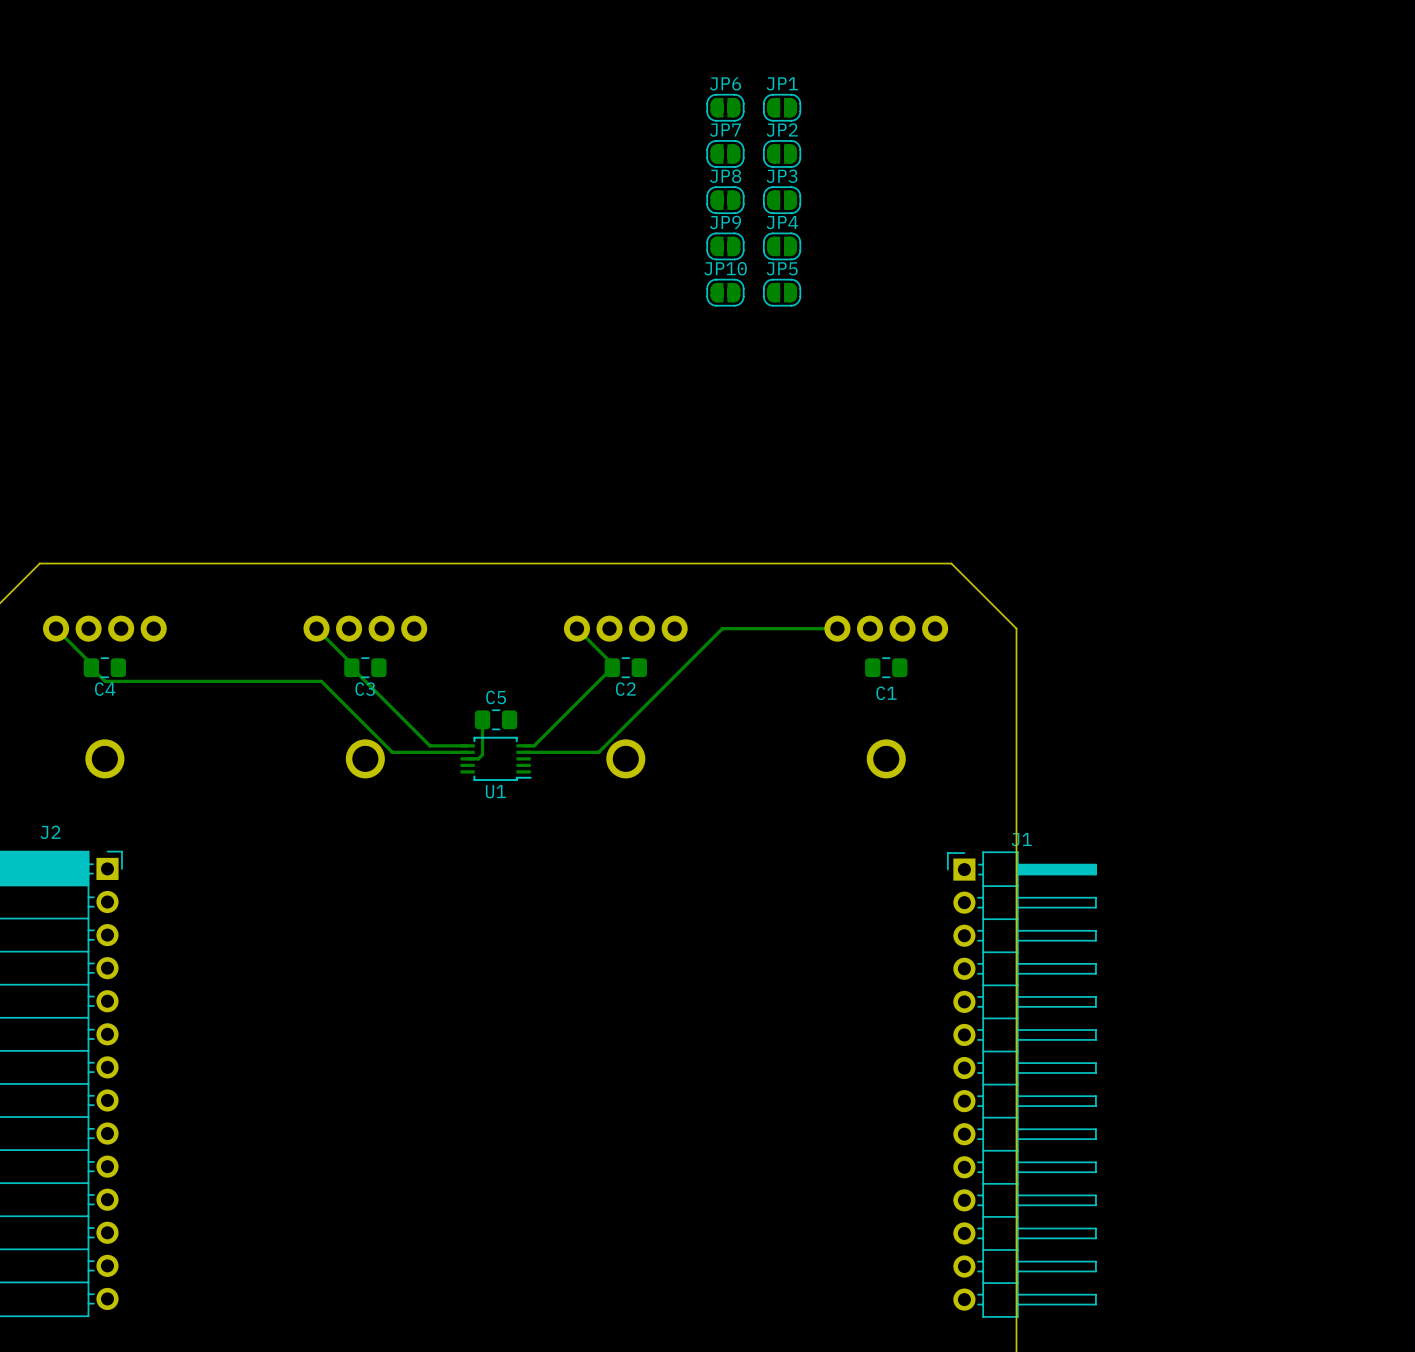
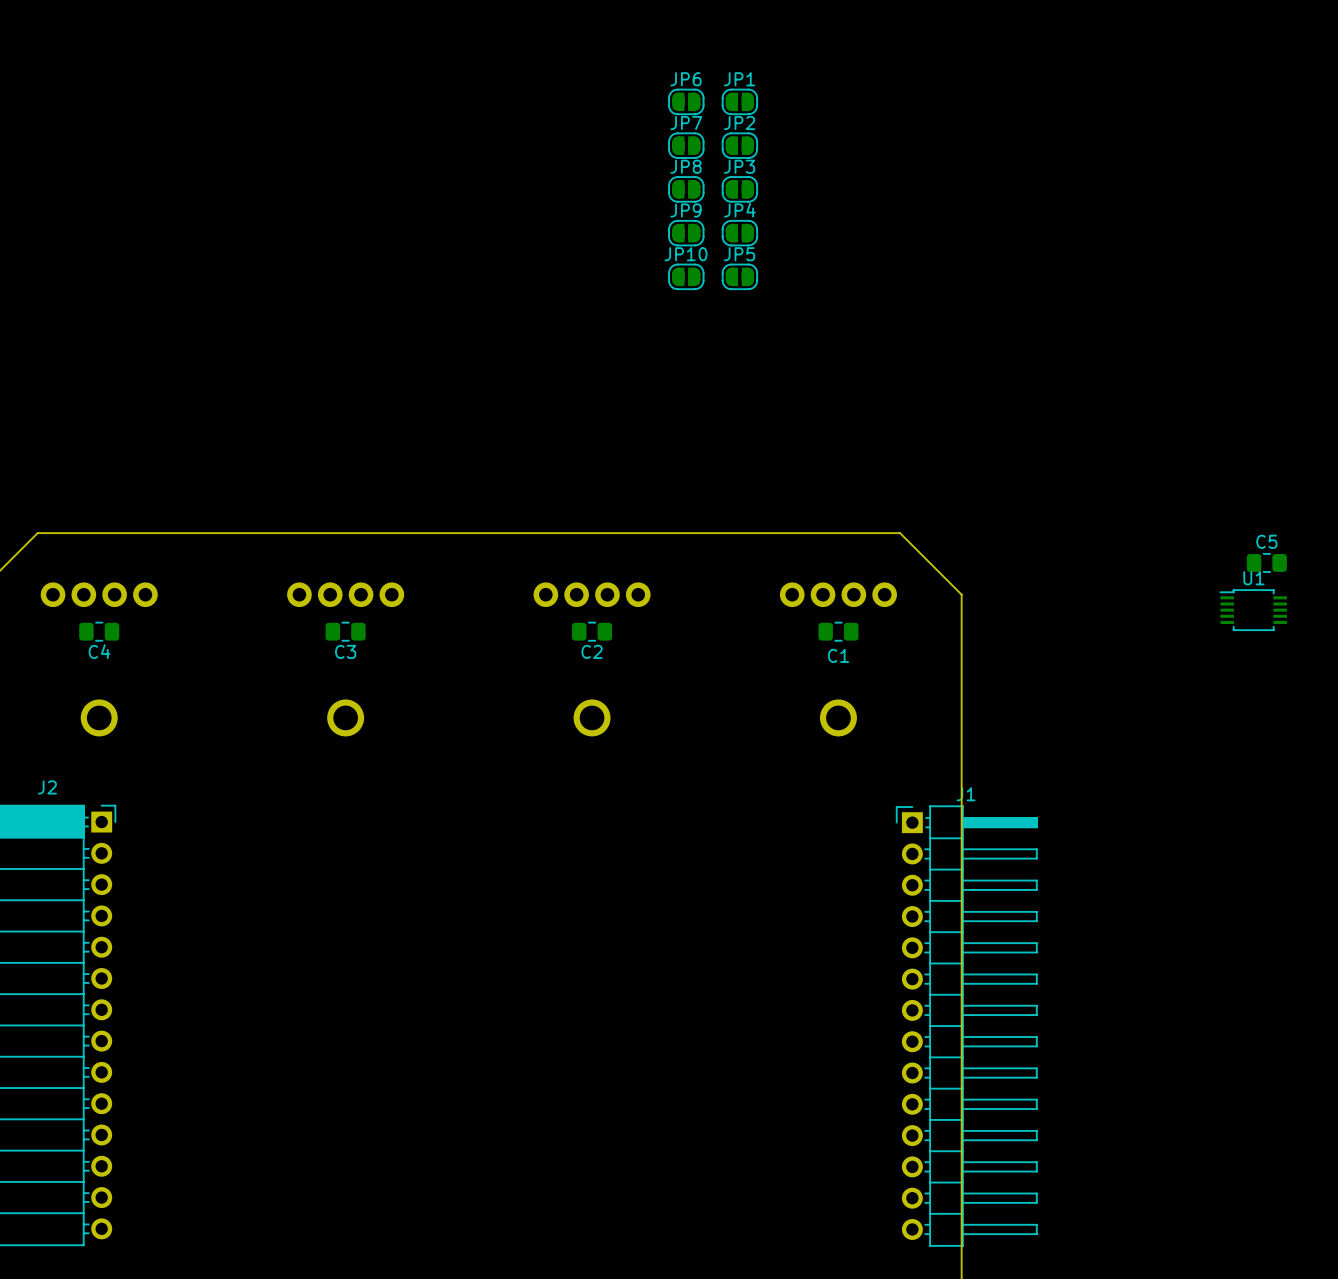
track: (56, 628) (91, 663) (91, 667) (105, 681) (321, 681) (392, 752) (467, 752) -> none
track: (316, 628) (351, 663) (351, 667) (429, 745) (467, 745) -> none
track: (576, 628) (612, 663) (612, 667) (534, 745) (523, 745) -> none
track: (837, 628) (722, 628) (598, 752) (523, 752) -> none
track: (482, 719) (482, 754) (478, 758) (467, 758) -> none
C5 position: (496, 719) -> (1266, 562)
U1 rotation: 0° (496, 758) -> 180° (1253, 610)
U1 position: (496, 758) -> (1253, 610)

